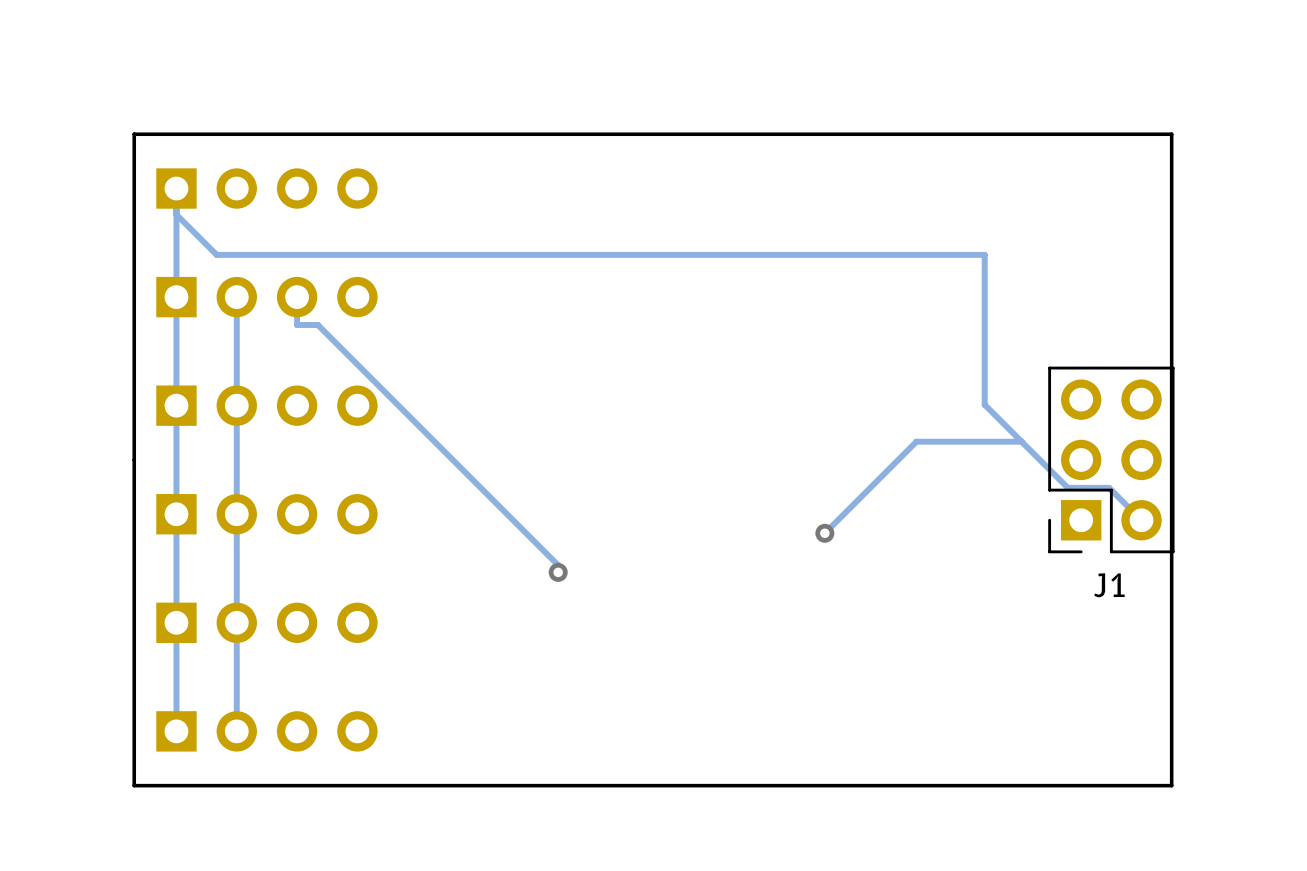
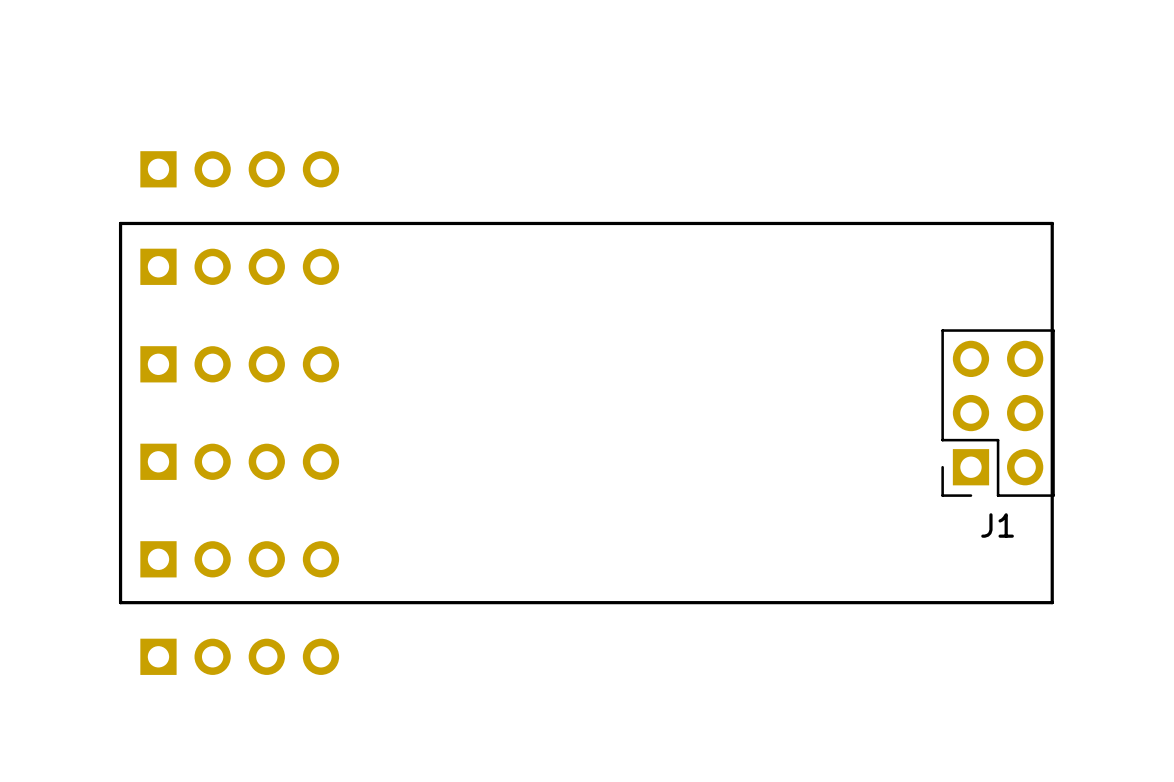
track: (176, 188) (176, 731) -> none
track: (176, 214) (216, 254) (984, 254) (984, 404) (1067, 487) (1109, 487) (1141, 520) -> none
board edge: (1171, 248) (1171, 134) (134, 134) (134, 248) -> (1052, 223) (120, 223)
track: (236, 297) (236, 731) -> none
track: (297, 297) (297, 325) (317, 325) (558, 565) (558, 572) -> none
track: (1021, 441) (916, 441) (824, 533) -> none
via: (824, 533) -> none
via: (558, 572) -> none
board edge: (1171, 671) (1171, 785) (134, 785) (134, 671) -> (1052, 602) (120, 602)

